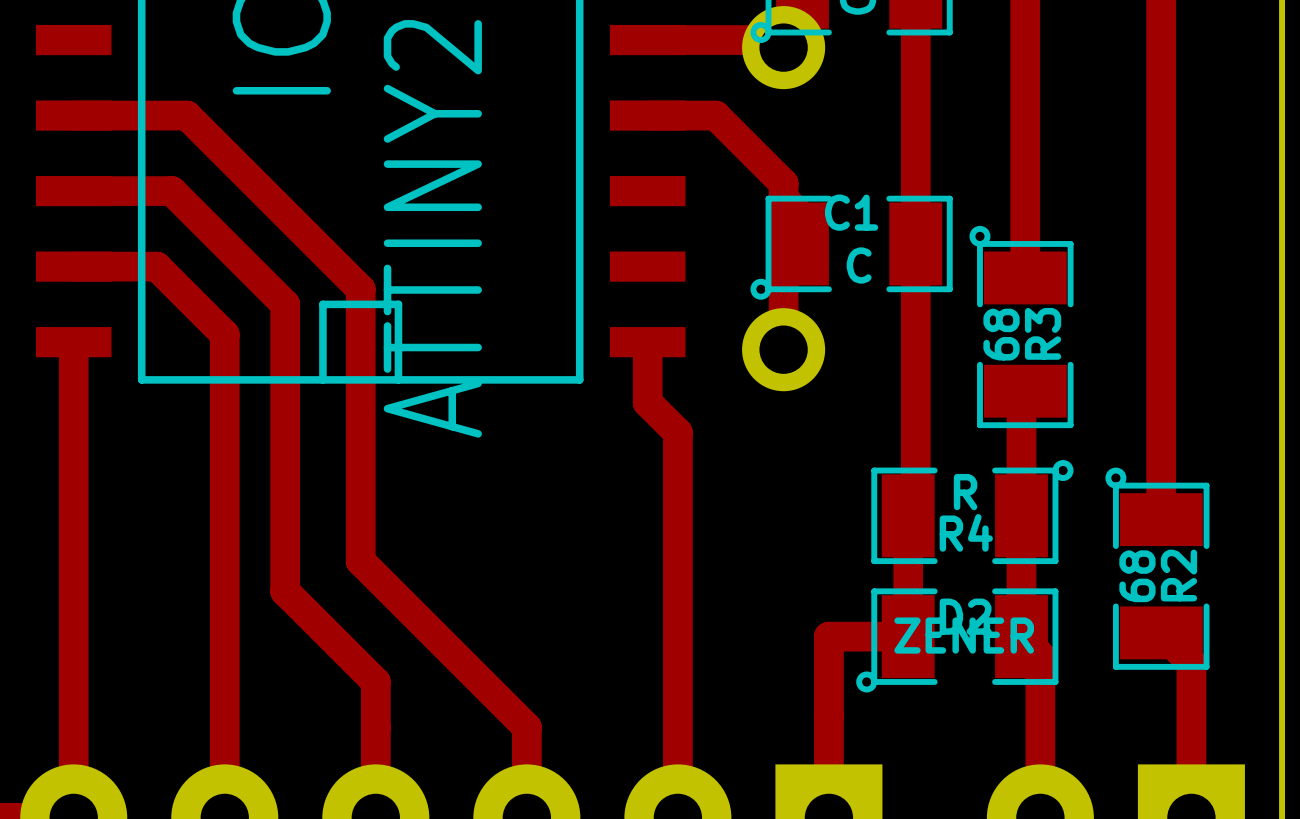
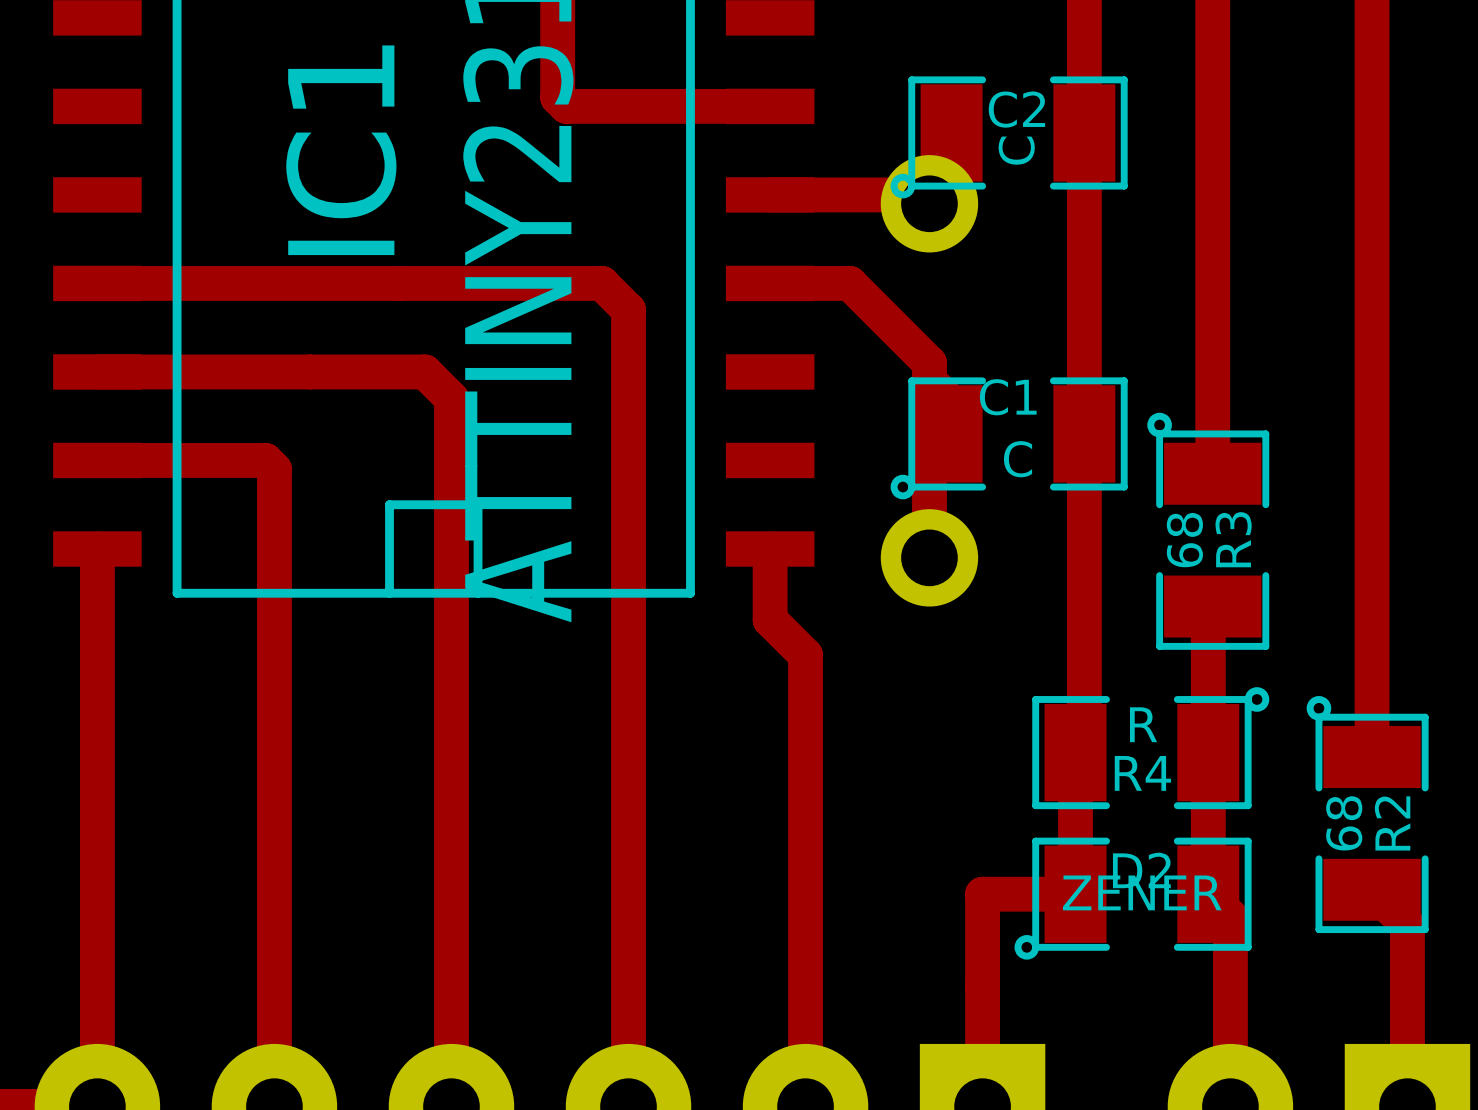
track: (187, 115) (360, 289) (360, 561) (526, 727) -> (230, 283) (601, 283) (628, 310) (628, 1000)
track: (171, 191) (285, 304) (285, 591) (375, 681) -> (212, 371) (424, 371) (451, 398) (451, 947)
track: (156, 266) (224, 334) -> (194, 460) (265, 460) (274, 469) (274, 540)

